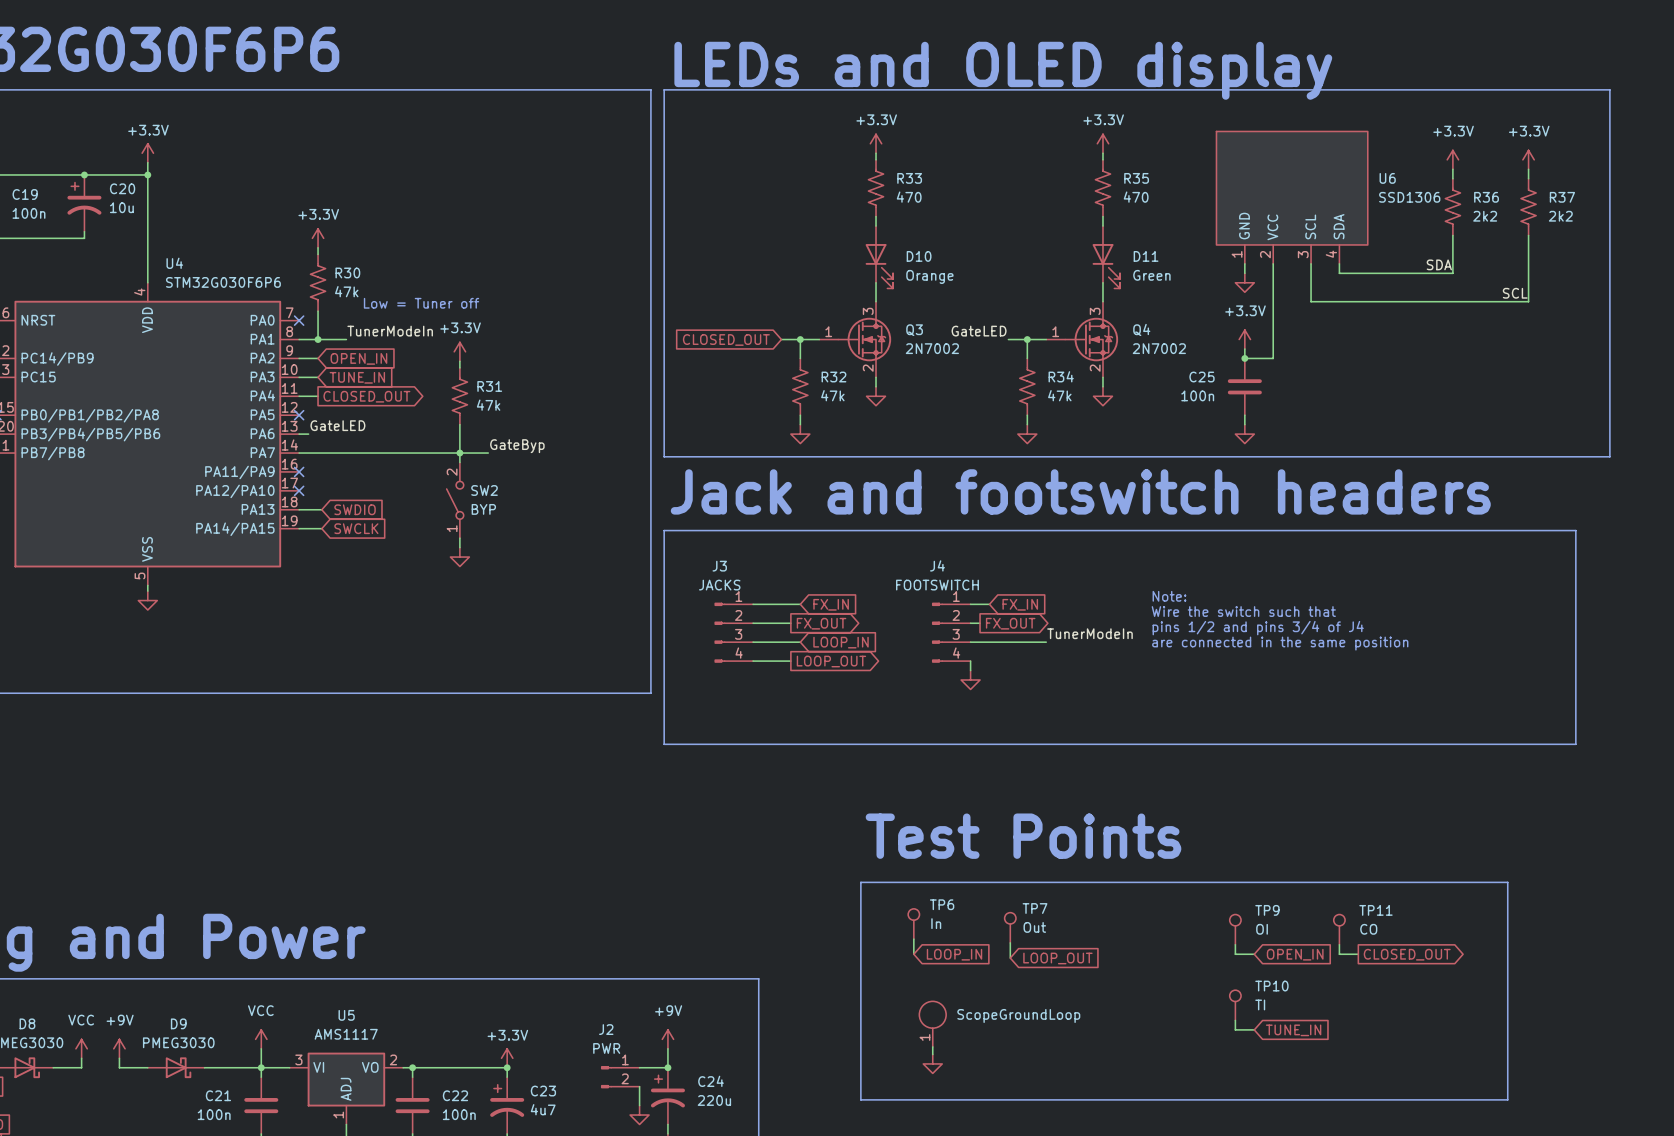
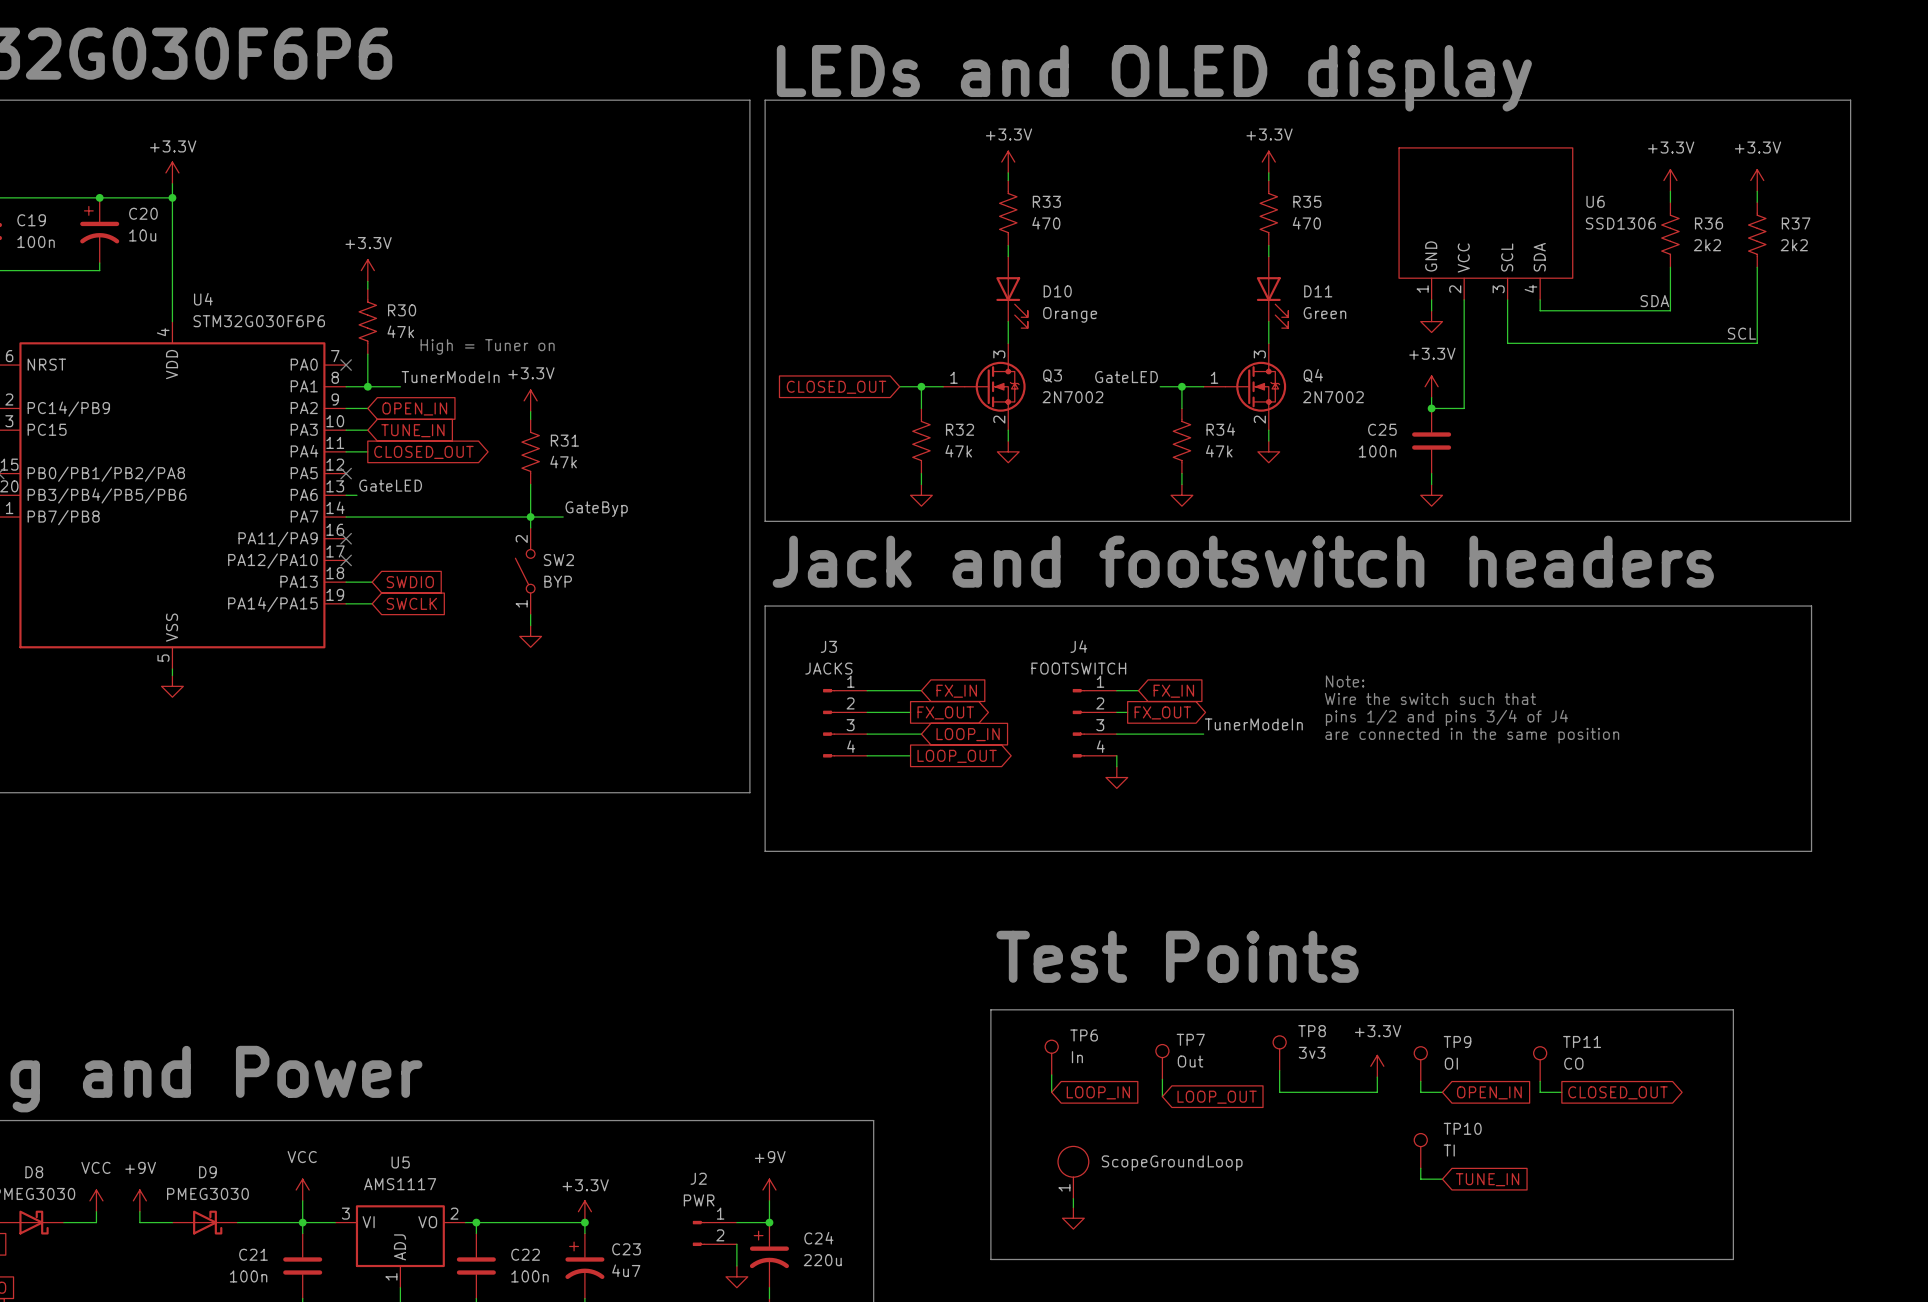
text: Low = Tuner off (421, 303) -> High = Tuner on (487, 346)
TP8: none -> 3v3 (1279, 1053)
power symbol: none -> +3.3V (1377, 1066)
wire: none -> (1279, 1070) (1279, 1092) (1377, 1092) (1377, 1077)

